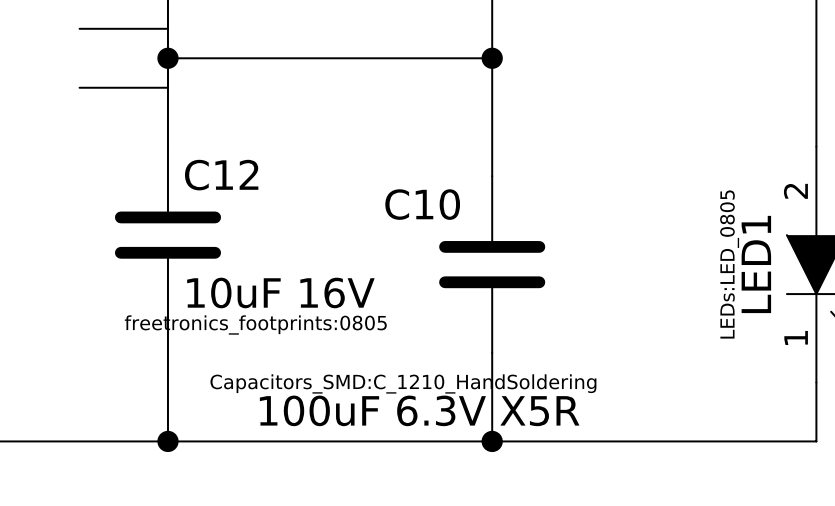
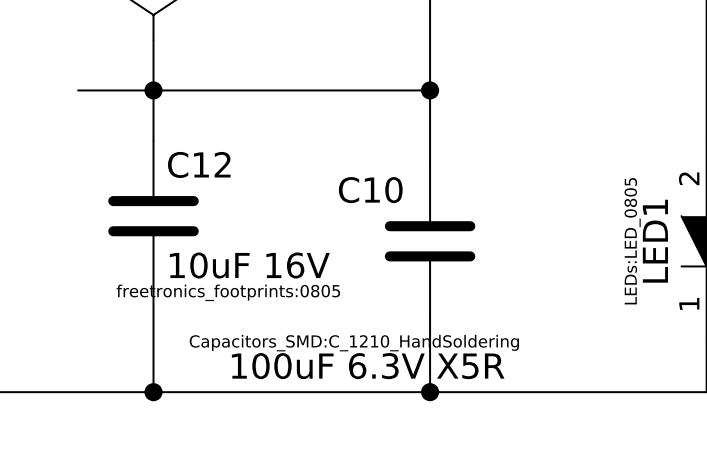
wire: (79, 28) (167, 28) -> none
wire: (167, 58) (492, 58) -> (153, 90) (430, 90)
junction position: (167, 58) -> (153, 90)
junction position: (492, 58) -> (430, 90)

